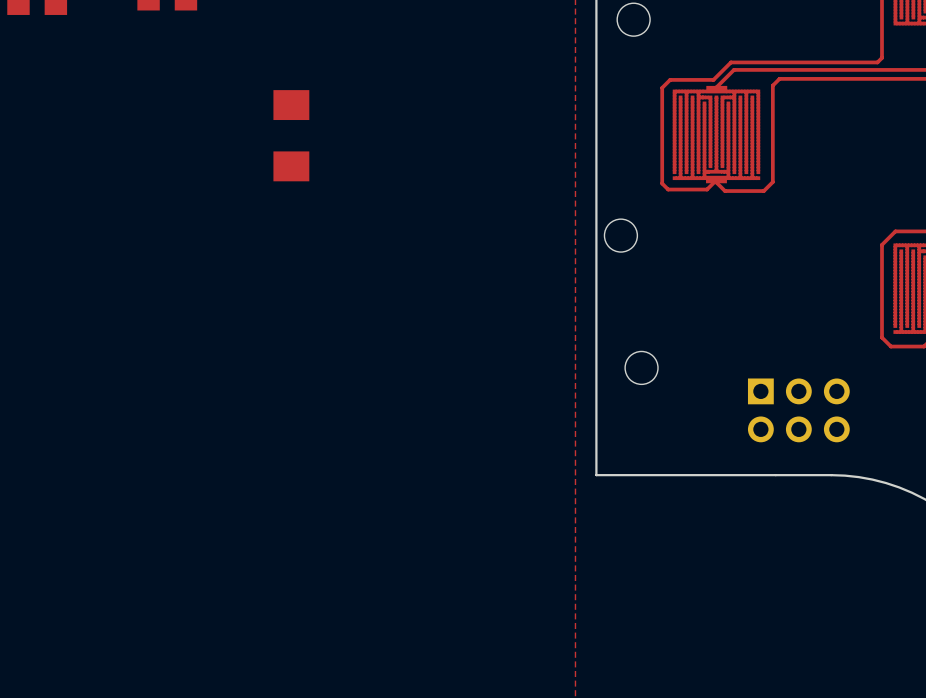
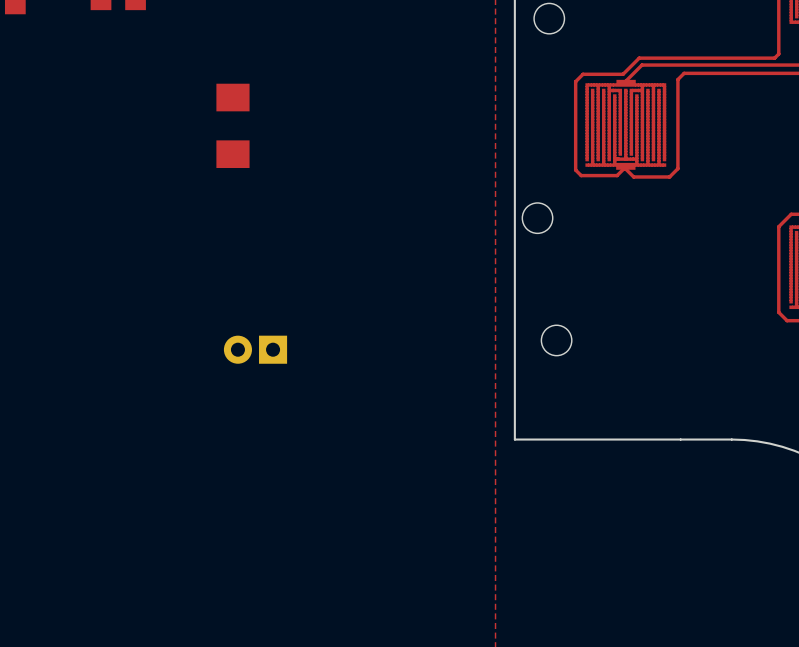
part: none -> (255, 349)
part: (798, 410) -> none

